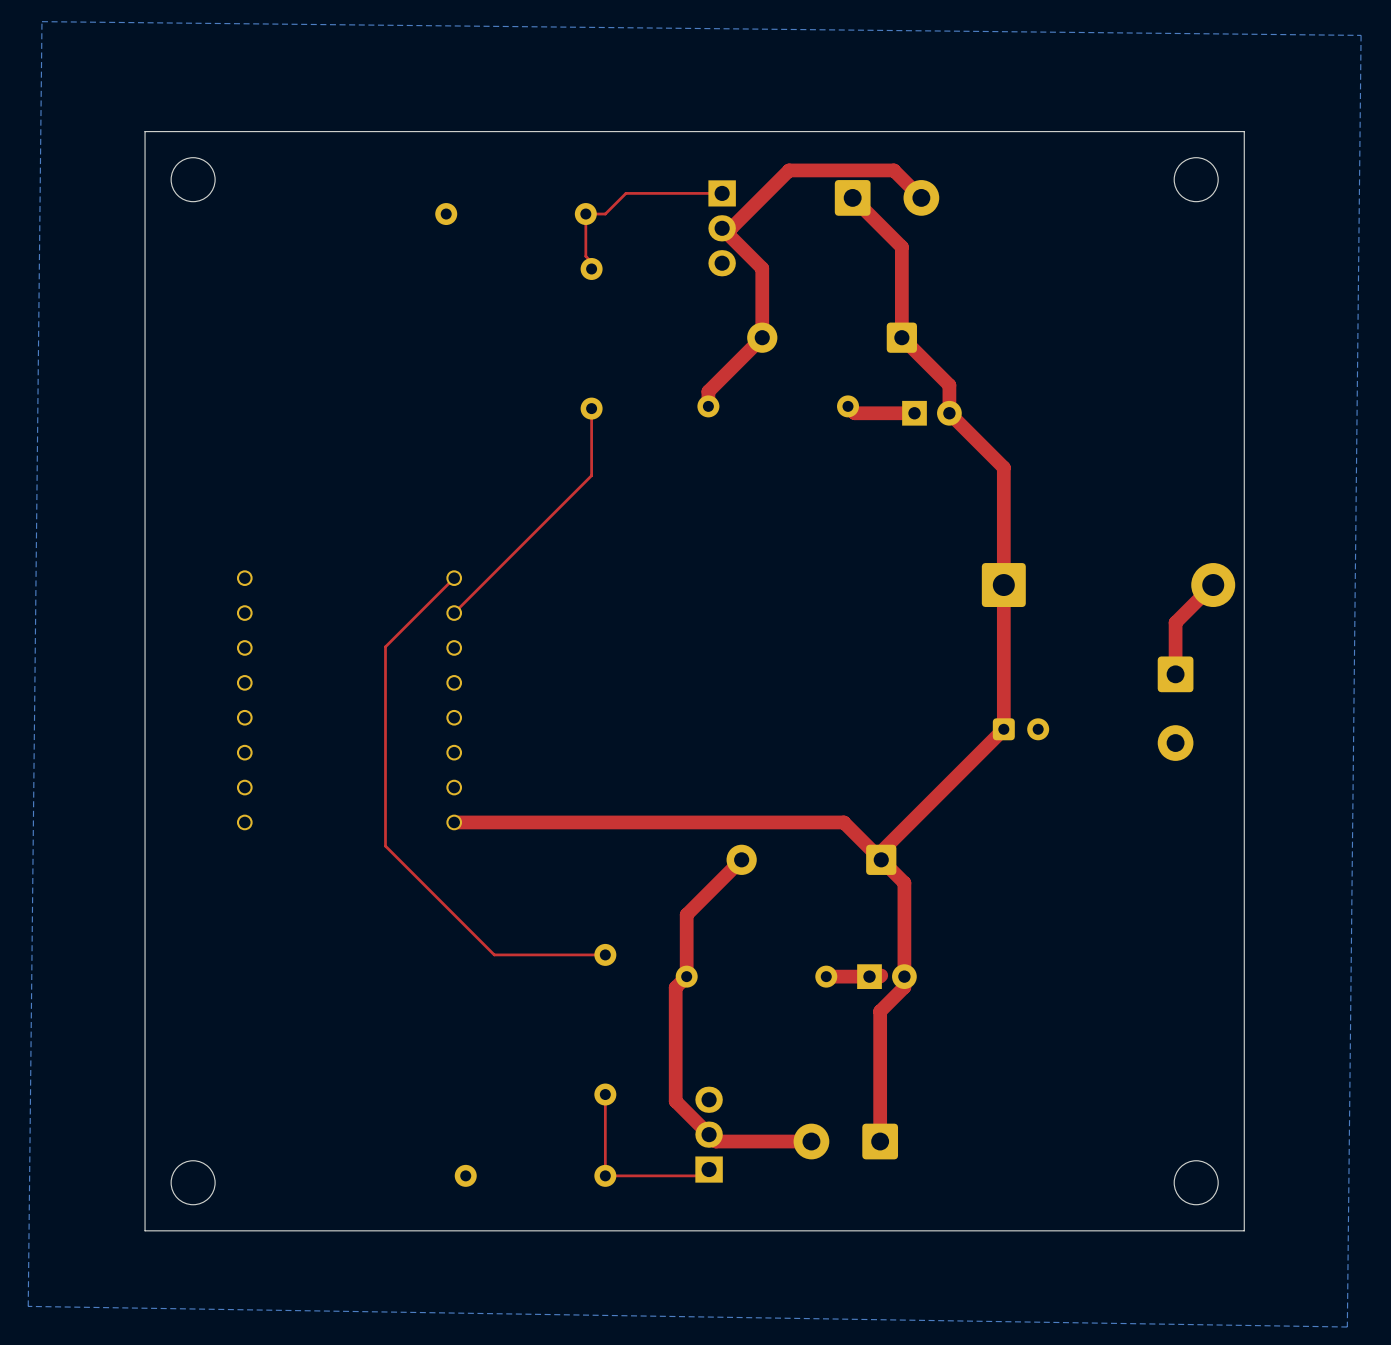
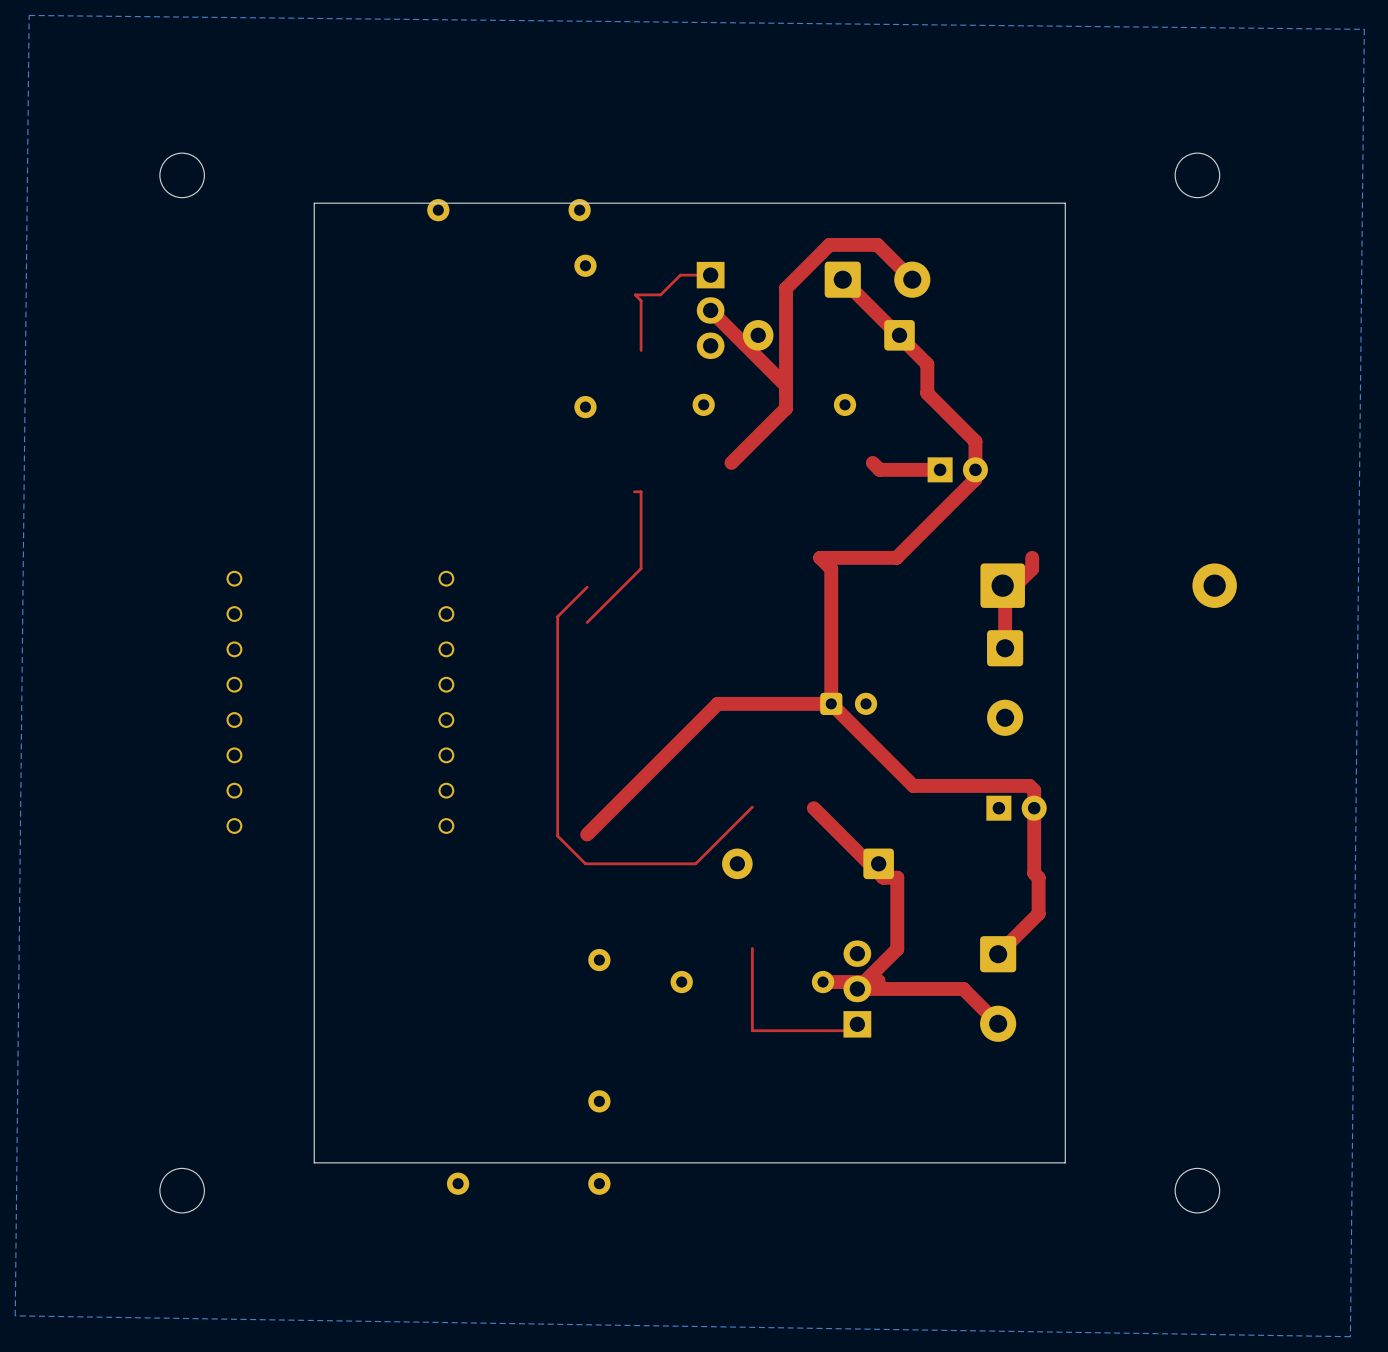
board edge: (1244, 131) (145, 131) (145, 1230) (1244, 1230) (1244, 131) -> (1065, 203) (1065, 1162) (314, 1162) (314, 203) (1065, 203)
top track: (722, 193) (625, 193) (605, 214) (585, 214) (585, 256) (591, 262) (591, 268) -> none
top track: (852, 197) (901, 247) (901, 337) (949, 385) (949, 413) (1003, 467) (1003, 729) (881, 851) (881, 859) -> none
part position: (887, 197) -> (877, 279)
top track: (921, 197) (893, 170) (789, 170) (731, 228) (722, 228) (762, 268) (762, 337) (708, 391) (708, 406) -> none
part position: (722, 228) -> (710, 310)
top track: none -> (710, 275) (680, 275) (660, 294) (635, 294) (641, 300) (641, 350)
top track: none -> (842, 279) (927, 364) (927, 393) (975, 441) (975, 479) (896, 557) (820, 557) (831, 568) (831, 703)
top track: none -> (912, 279) (877, 244) (829, 244) (786, 288) (786, 408) (731, 462)
top track: none -> (710, 310) (786, 385)
top track: (848, 406) (854, 413) (914, 413) -> (872, 462) (879, 469) (940, 469)
top track: (591, 408) (591, 475) (454, 613) -> none
part position: (931, 413) -> (957, 469)
top track: none -> (634, 491) (641, 491) (641, 568) (587, 622)
top track: none -> (1032, 557) (1032, 568) (1005, 595) (1005, 648)
top track: (454, 578) (385, 646) (385, 846) (494, 954) (605, 954) -> none
top track: (1213, 585) (1175, 622) (1175, 674) -> none
top track: none -> (587, 587) (557, 616) (557, 836) (585, 863) (695, 863) (752, 807)
part: none -> (1005, 683)
top track: none -> (831, 703) (913, 785) (1029, 785) (1034, 790) (1034, 873) (1038, 877) (1038, 913) (998, 954)
top track: none -> (831, 703) (717, 703) (587, 834)
part: (1175, 708) -> none
part position: (1021, 729) -> (848, 703)
top track: none -> (813, 808) (883, 877) (897, 877) (897, 949) (857, 988) (963, 988) (998, 1023)
part: none -> (1016, 808)
top track: (454, 822) (843, 822) (904, 882) (904, 987) (880, 1011) (880, 1141) -> none
top track: (741, 859) (686, 914) (686, 976) (675, 987) (675, 1101) (715, 1141) (811, 1141) -> none
part: (886, 976) -> none
part: none -> (998, 988)
top track: (605, 1094) (605, 1175) (702, 1175) (709, 1169) -> (752, 948) (752, 1030) (850, 1030) (857, 1024)
part position: (709, 1134) -> (857, 988)
part: (845, 1141) -> none

